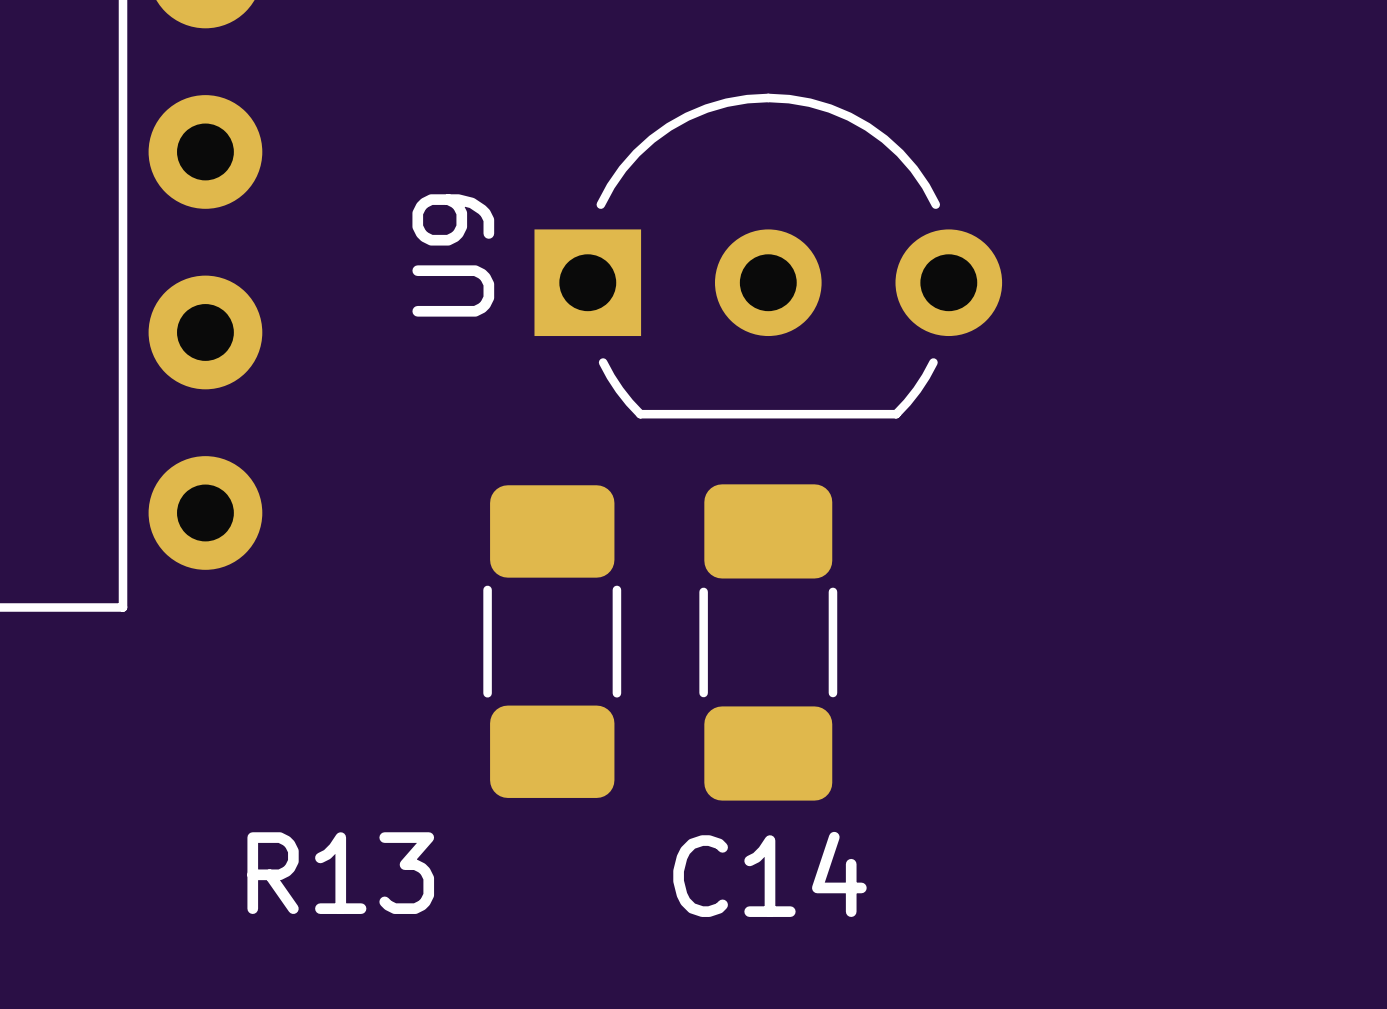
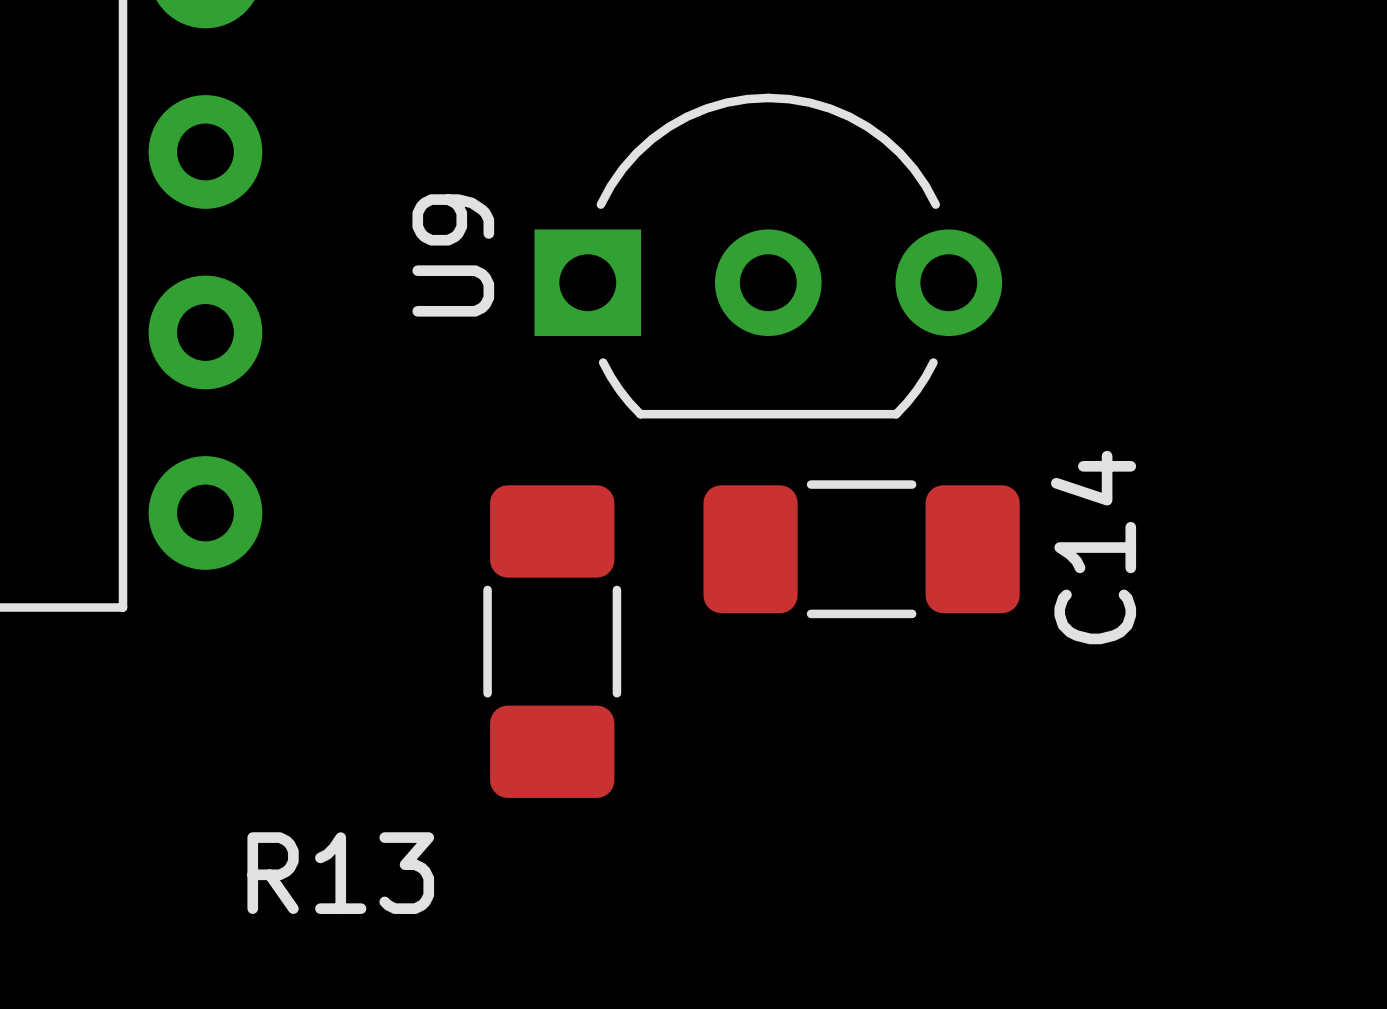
C14 rotation: 0° (768, 642) -> 90° clockwise (861, 549)
C14 name position: C14 (769, 874) -> C14 (1093, 547)

